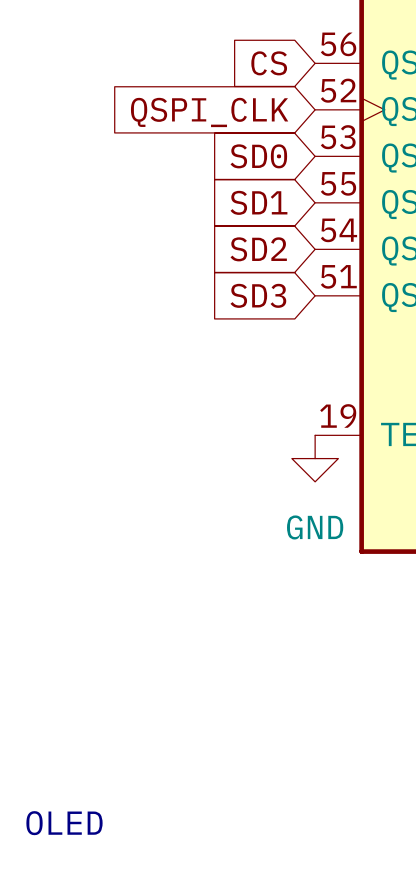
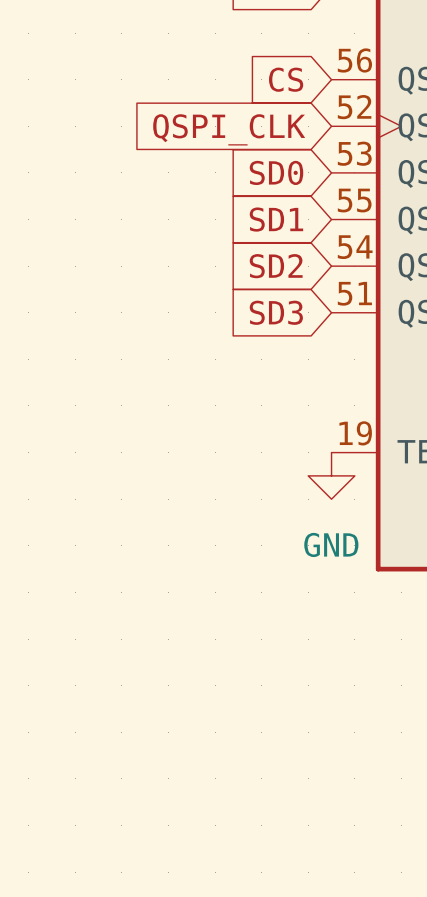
text: OLED (64, 823) -> none

